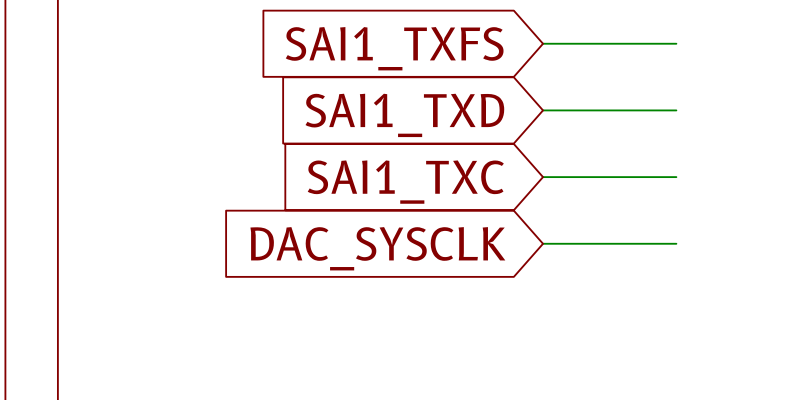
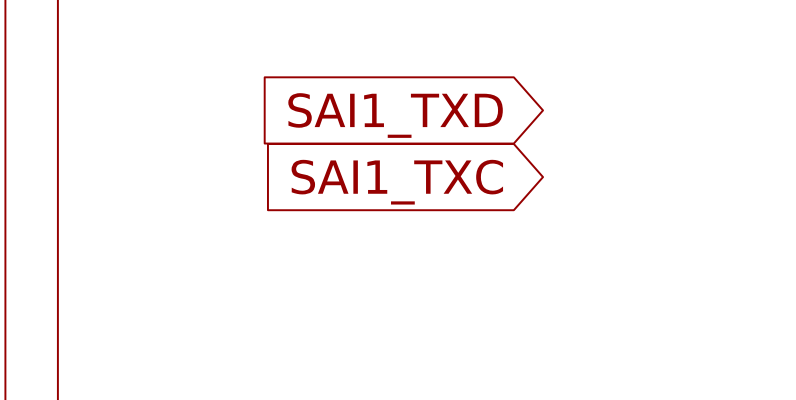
wire: (543, 43) (676, 43) -> none
global label: SAI1_TXFS (394, 48) -> none
wire: (543, 110) (676, 110) -> none
wire: (543, 177) (676, 177) -> none
wire: (543, 243) (676, 243) -> none
global label: DAC_SYSCLK (377, 248) -> none

